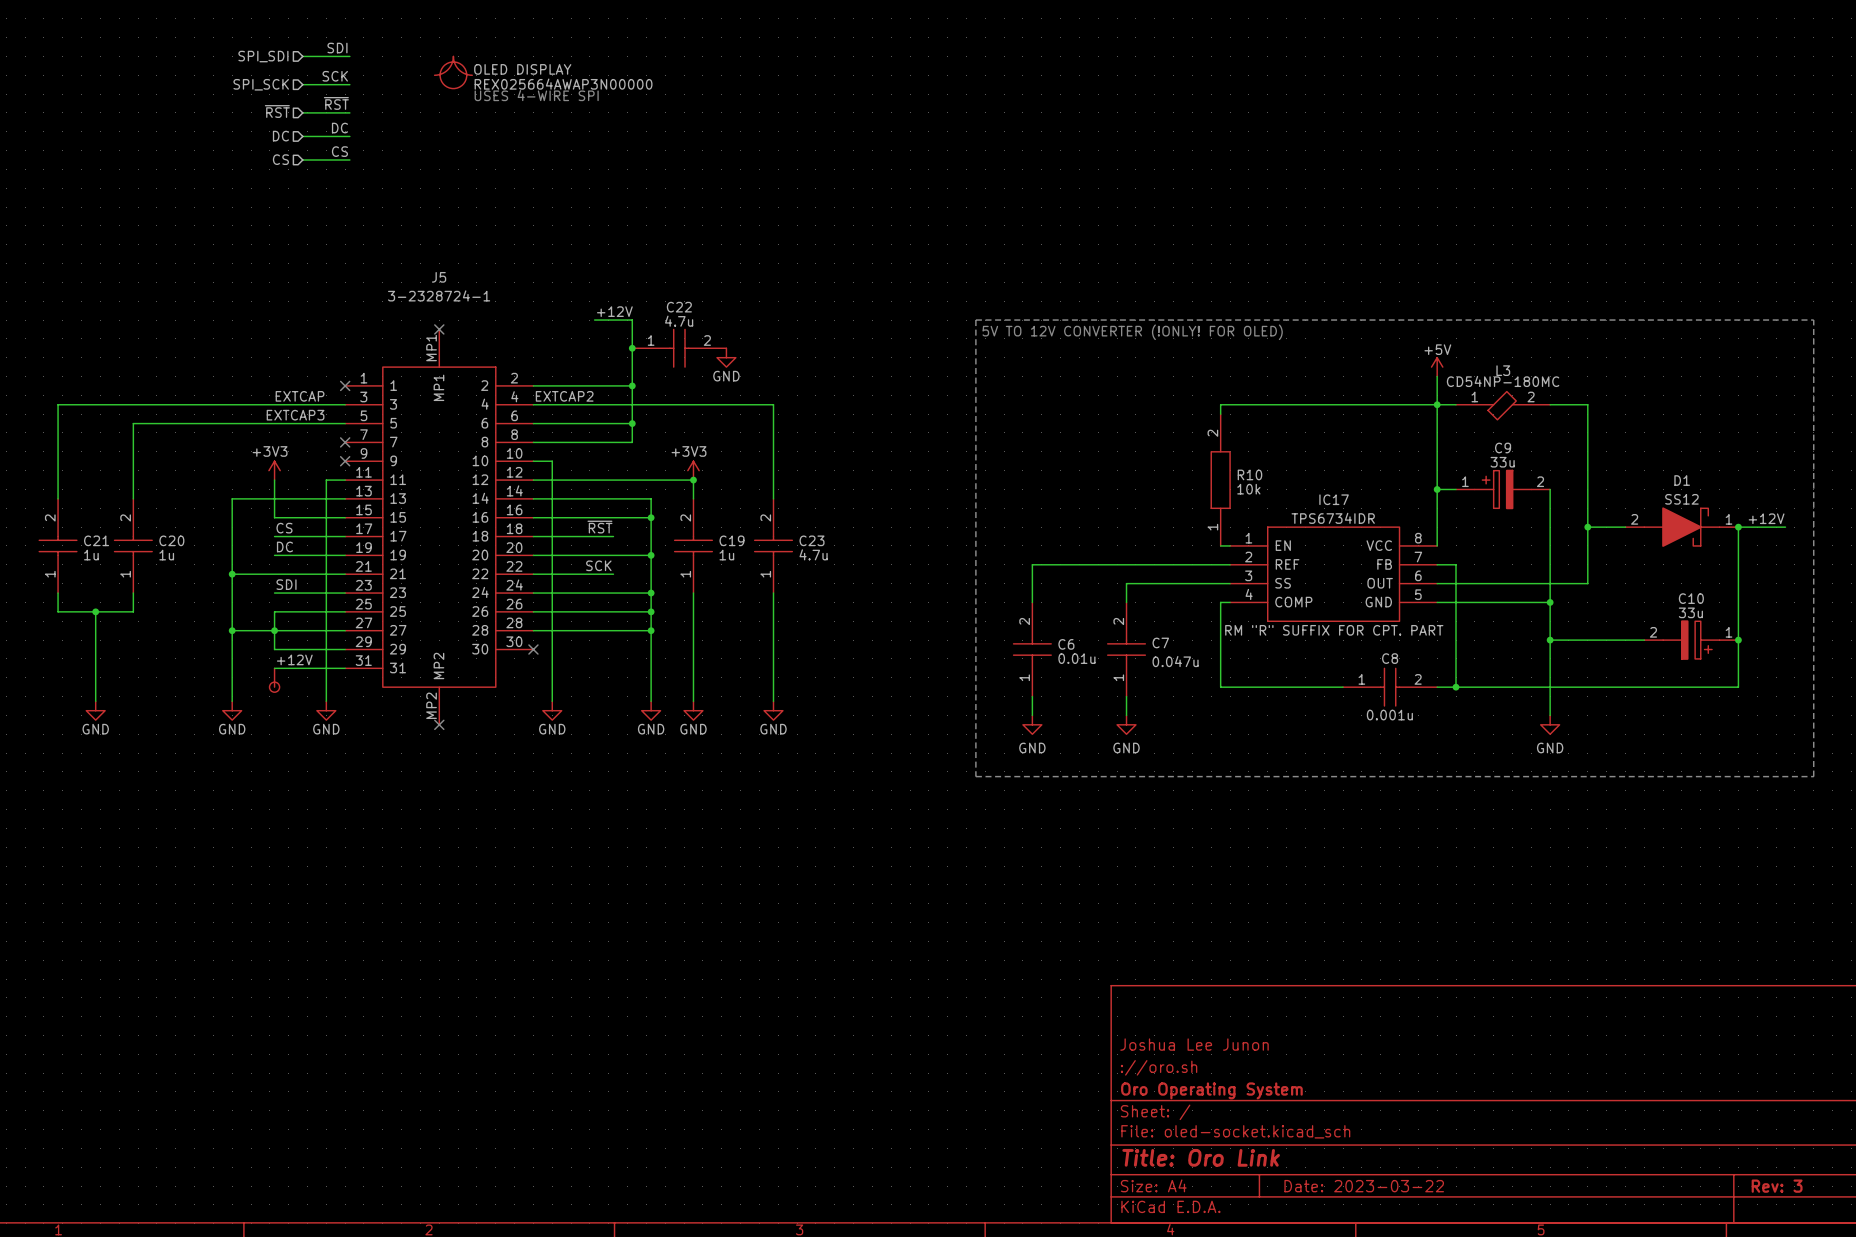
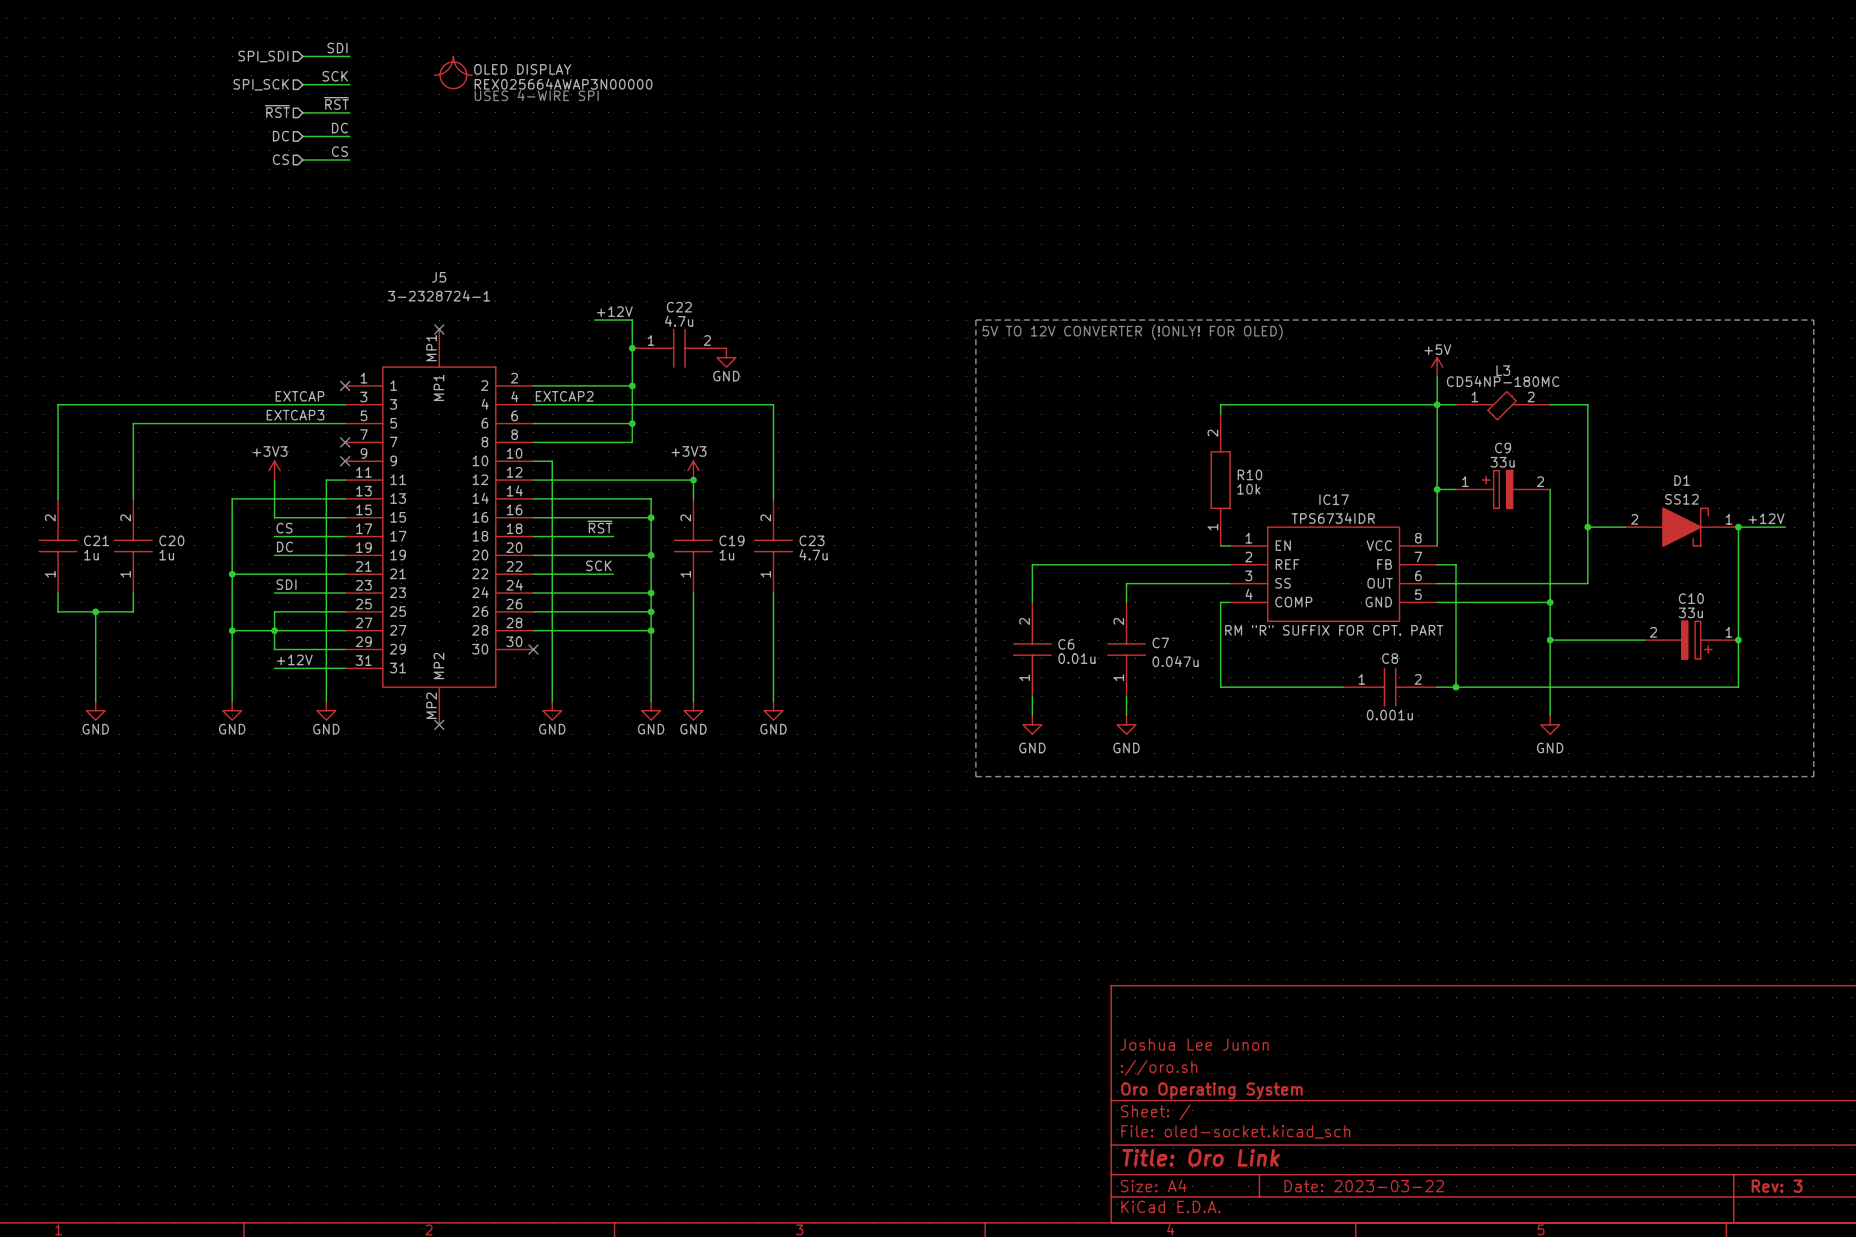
part: (274, 680) -> none

